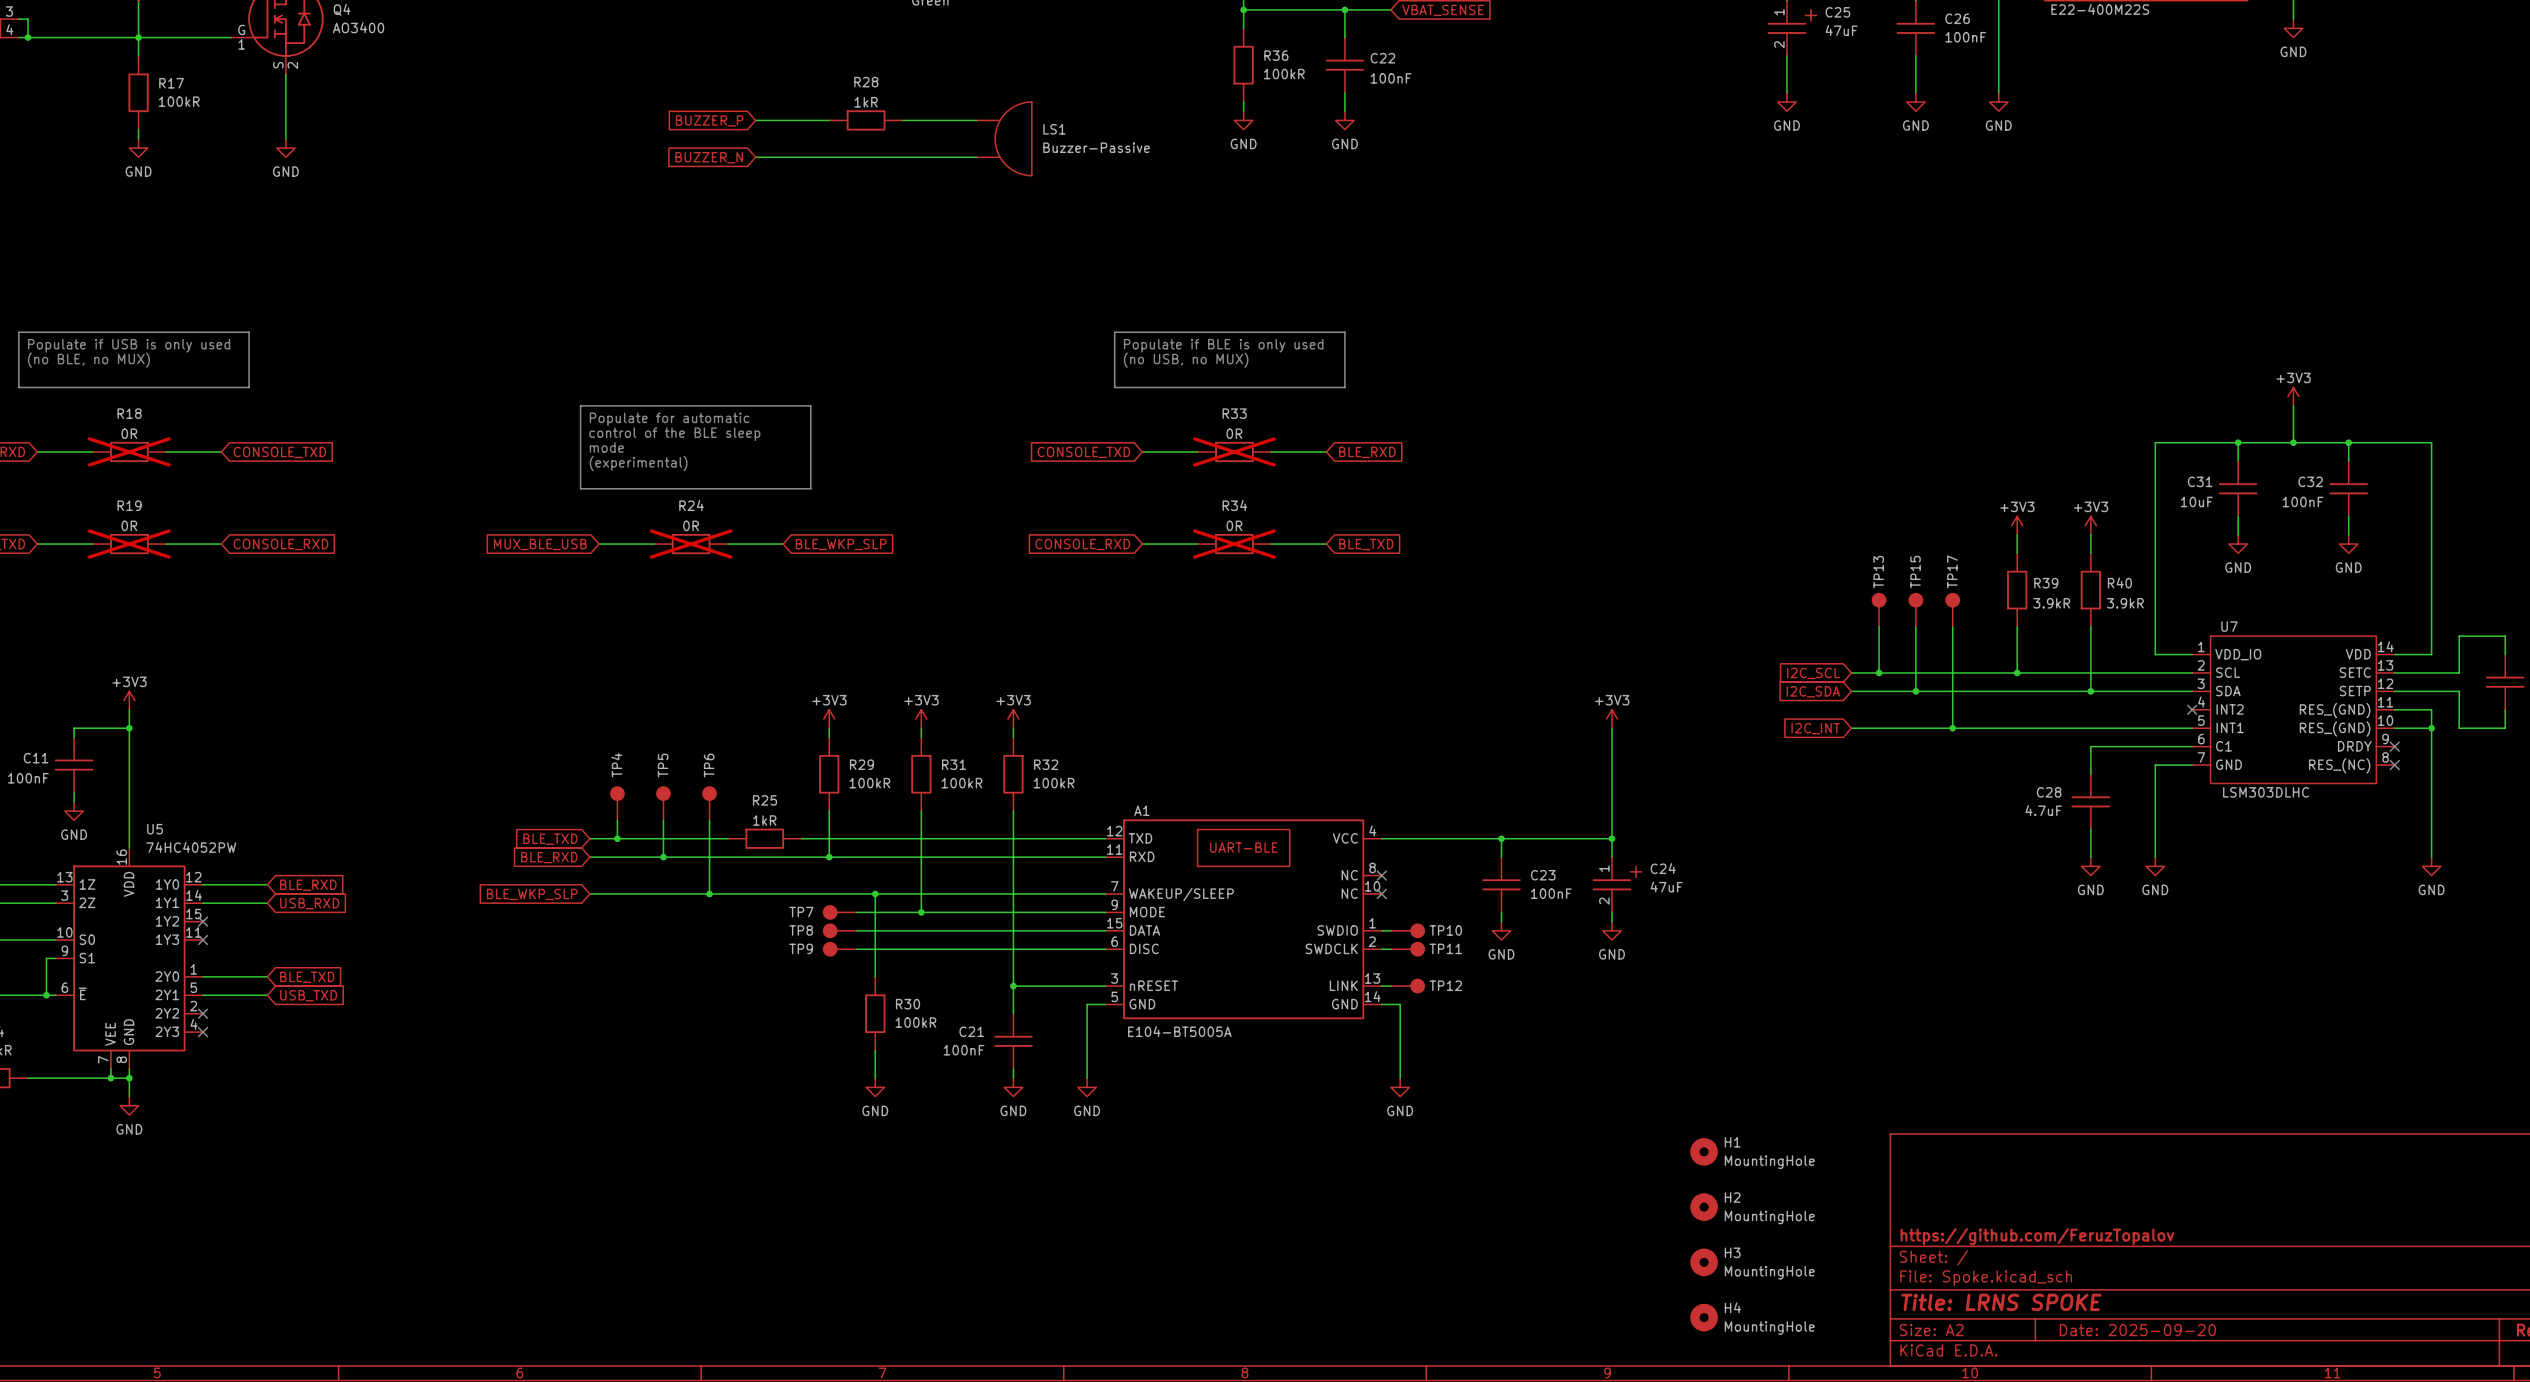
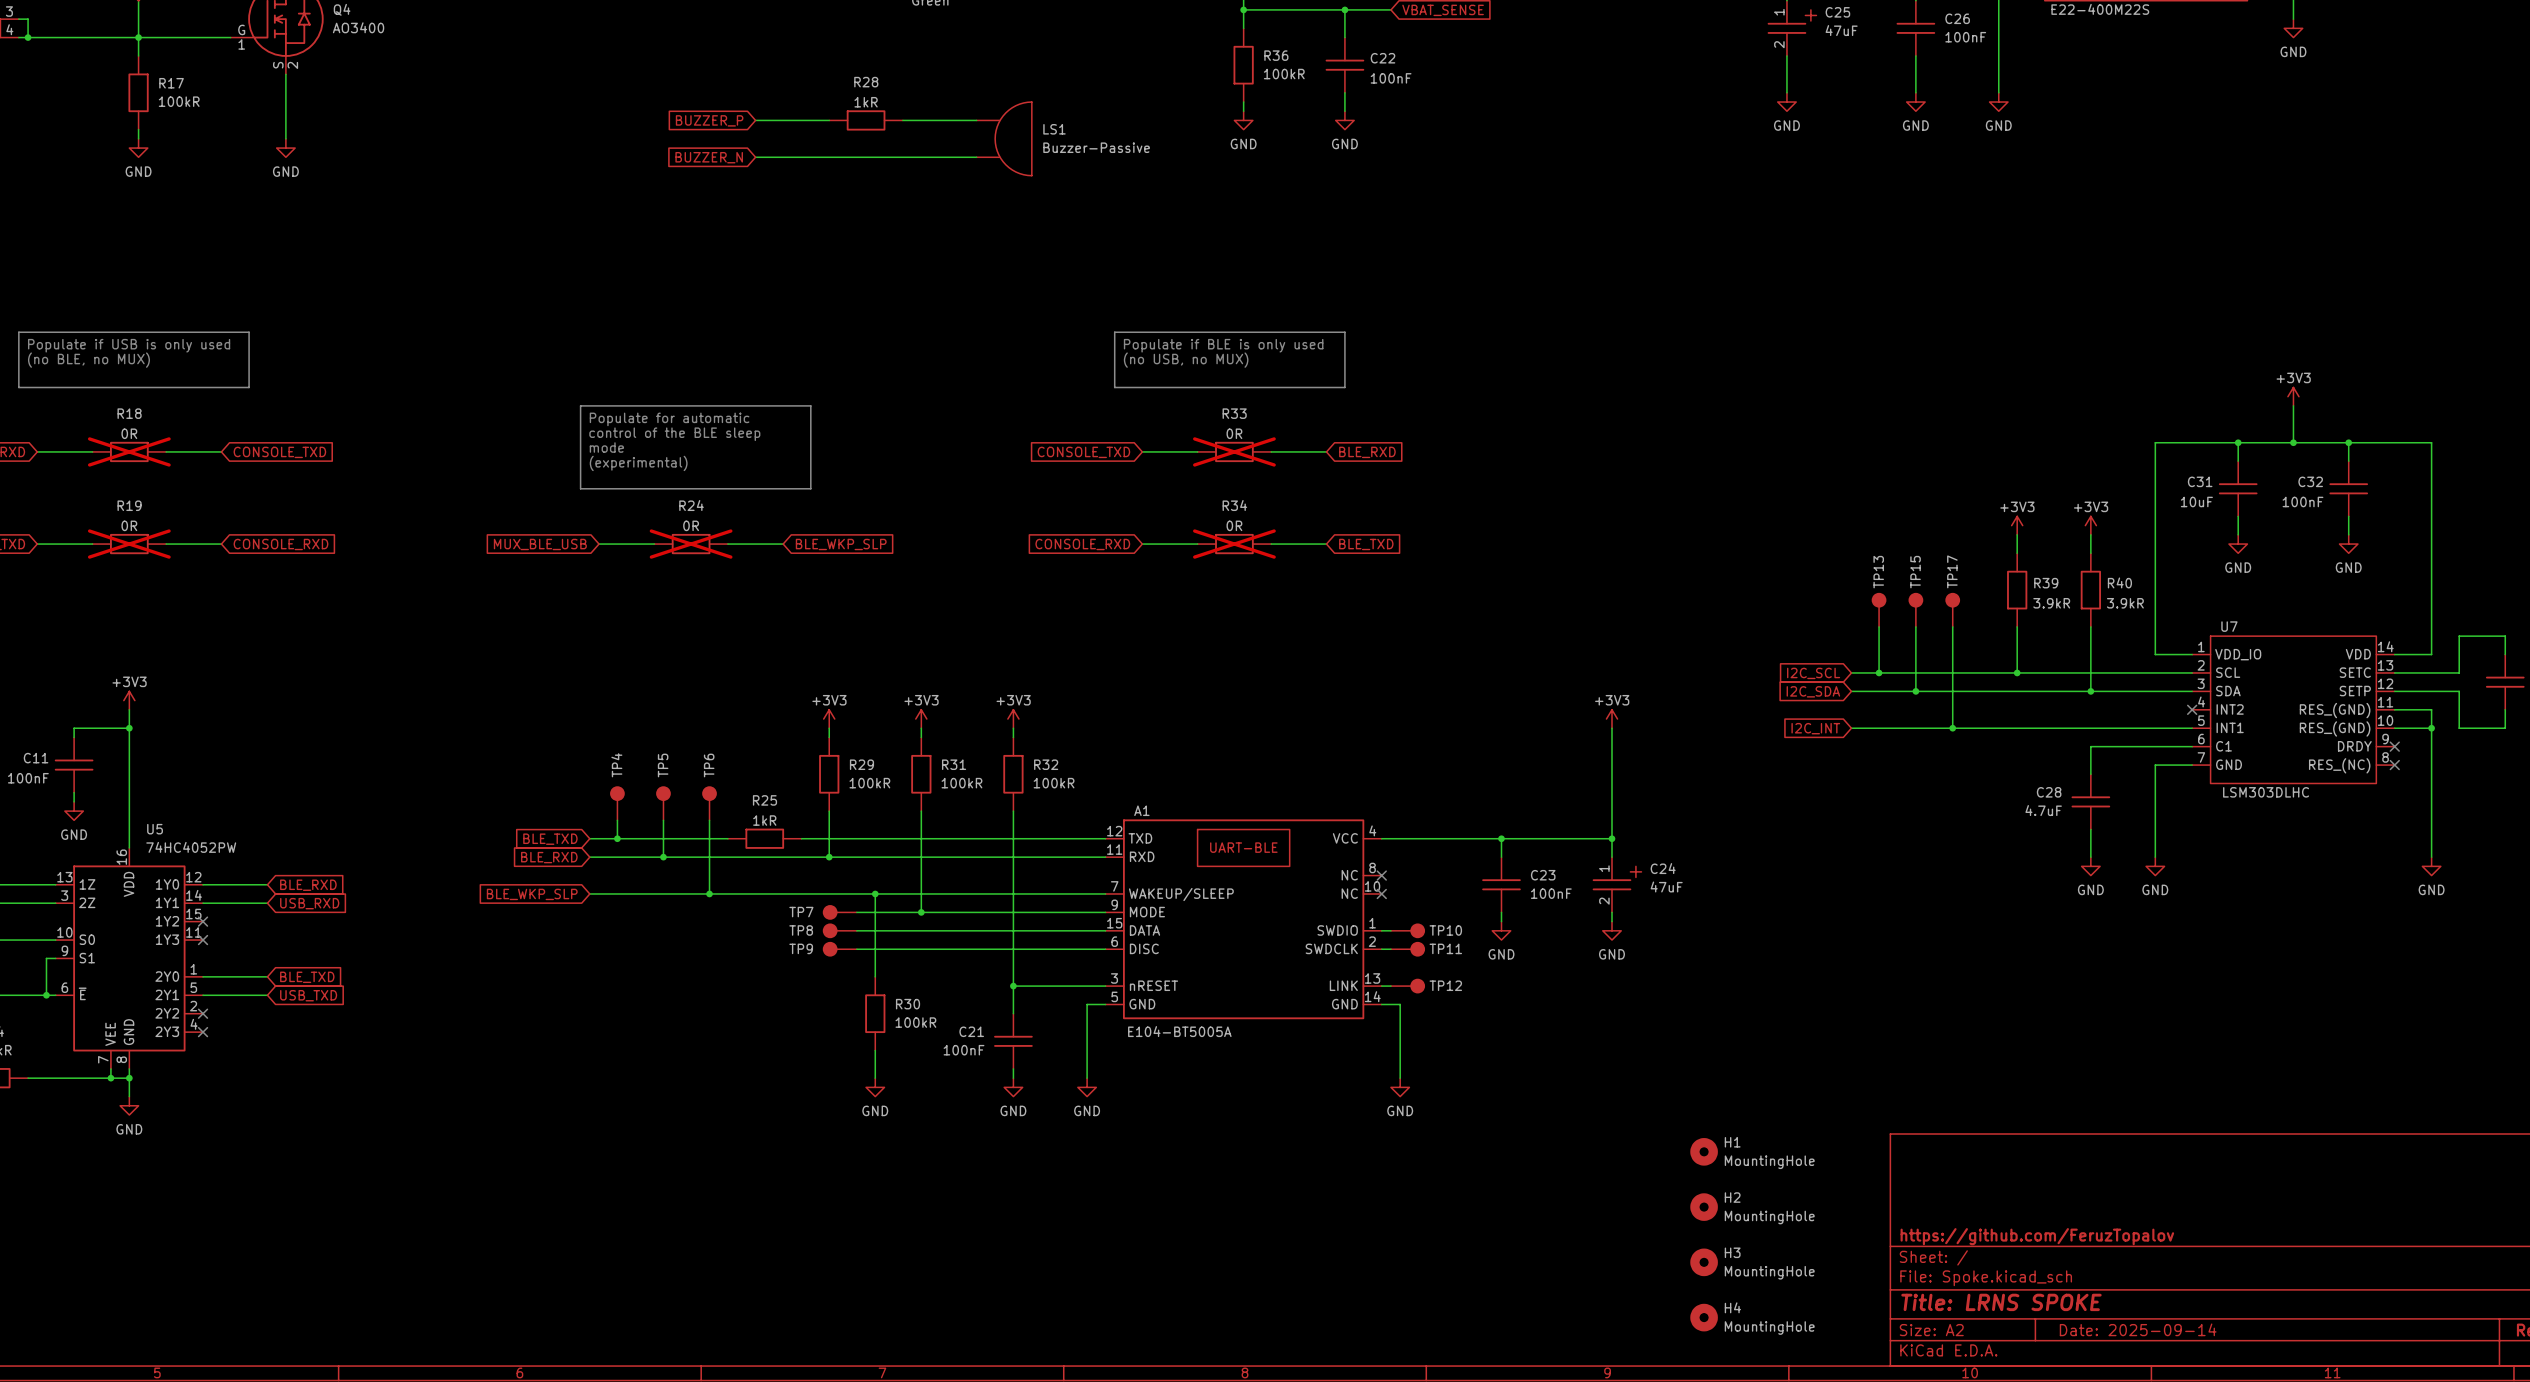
title block: Date: 2025-09-20 (2137, 1330) -> Date: 2025-09-14 (2138, 1329)

